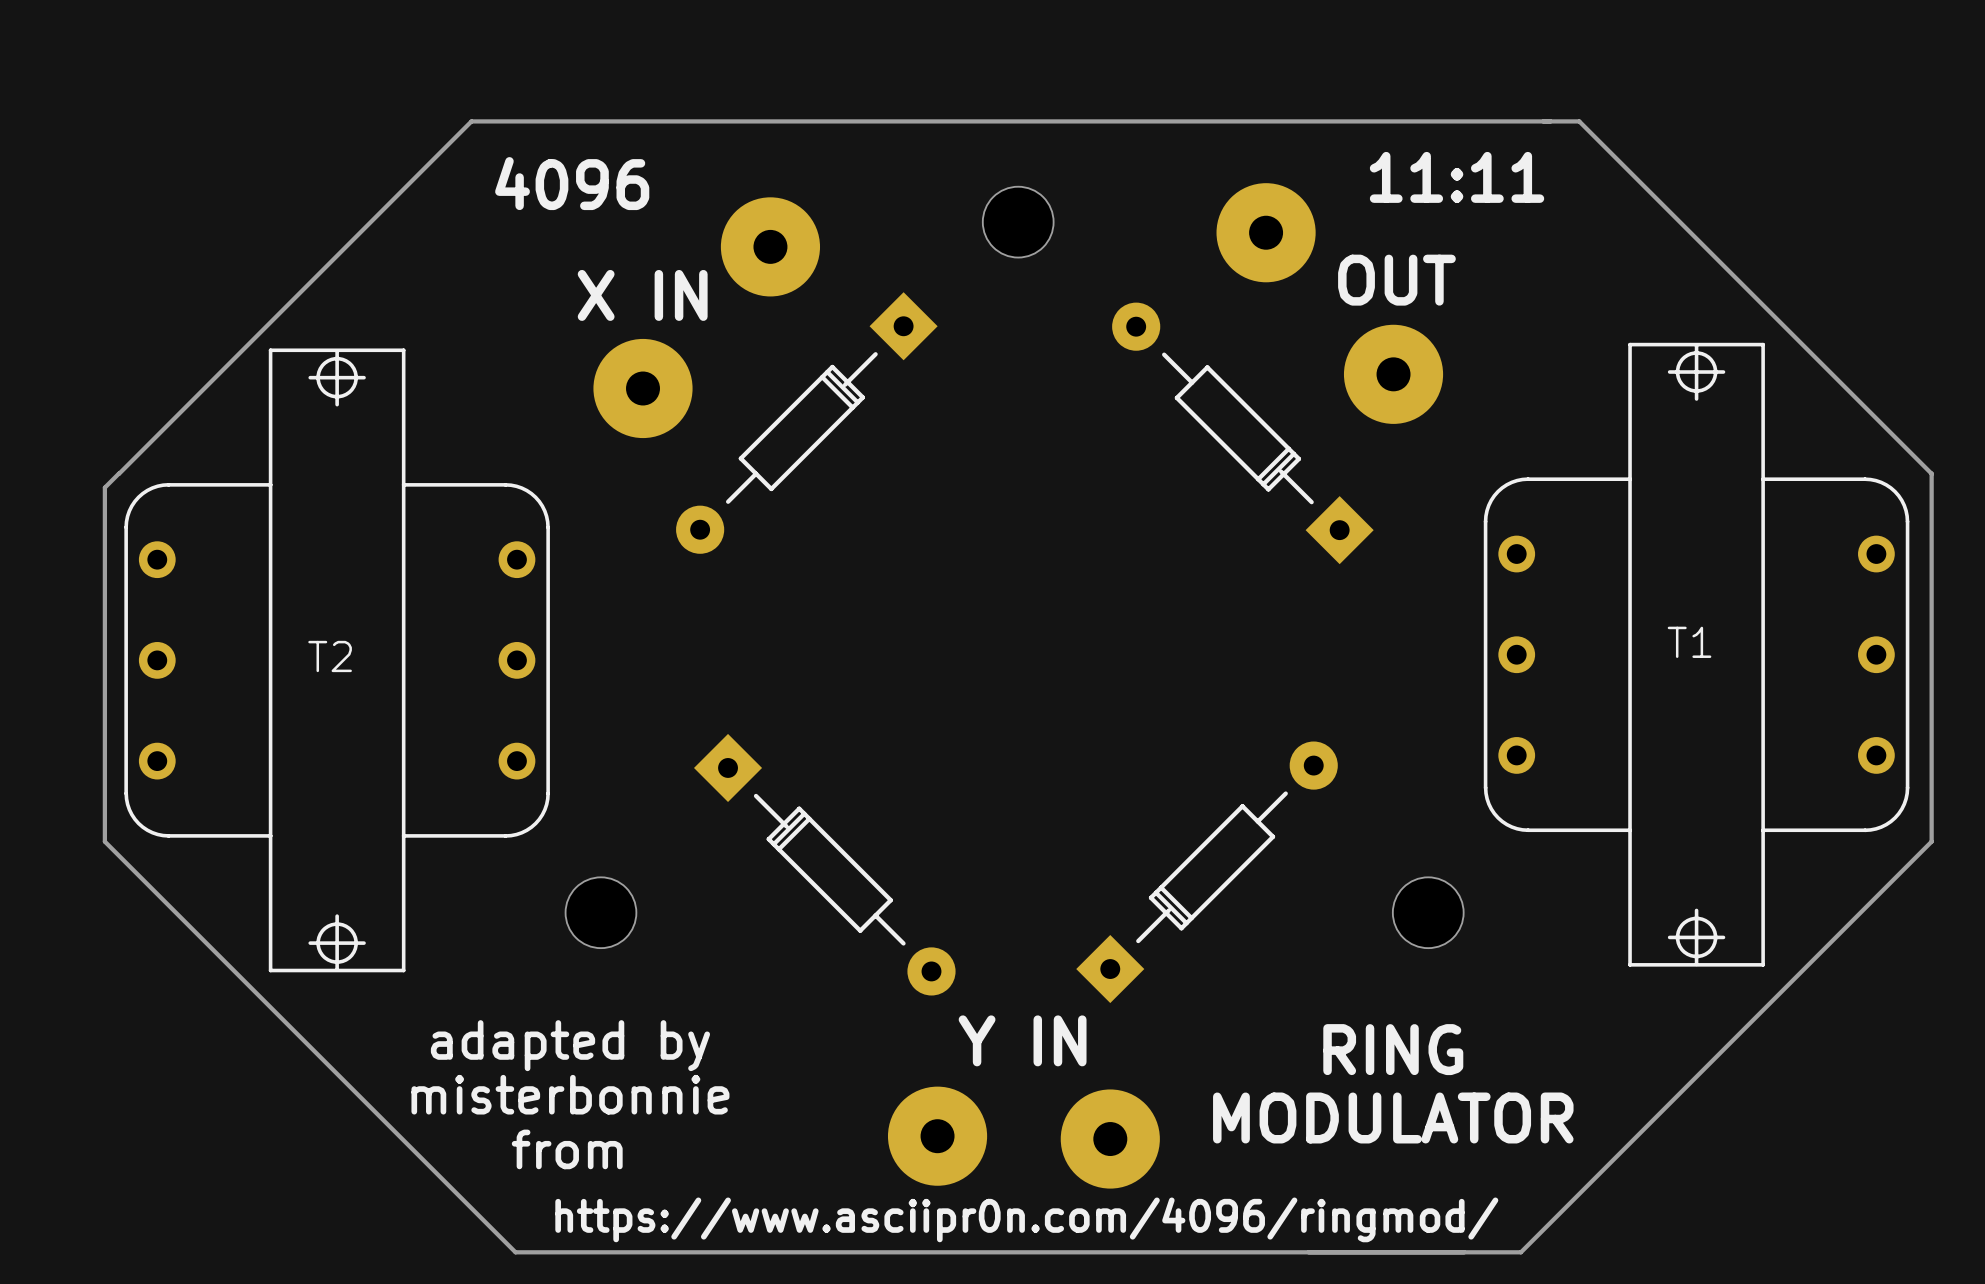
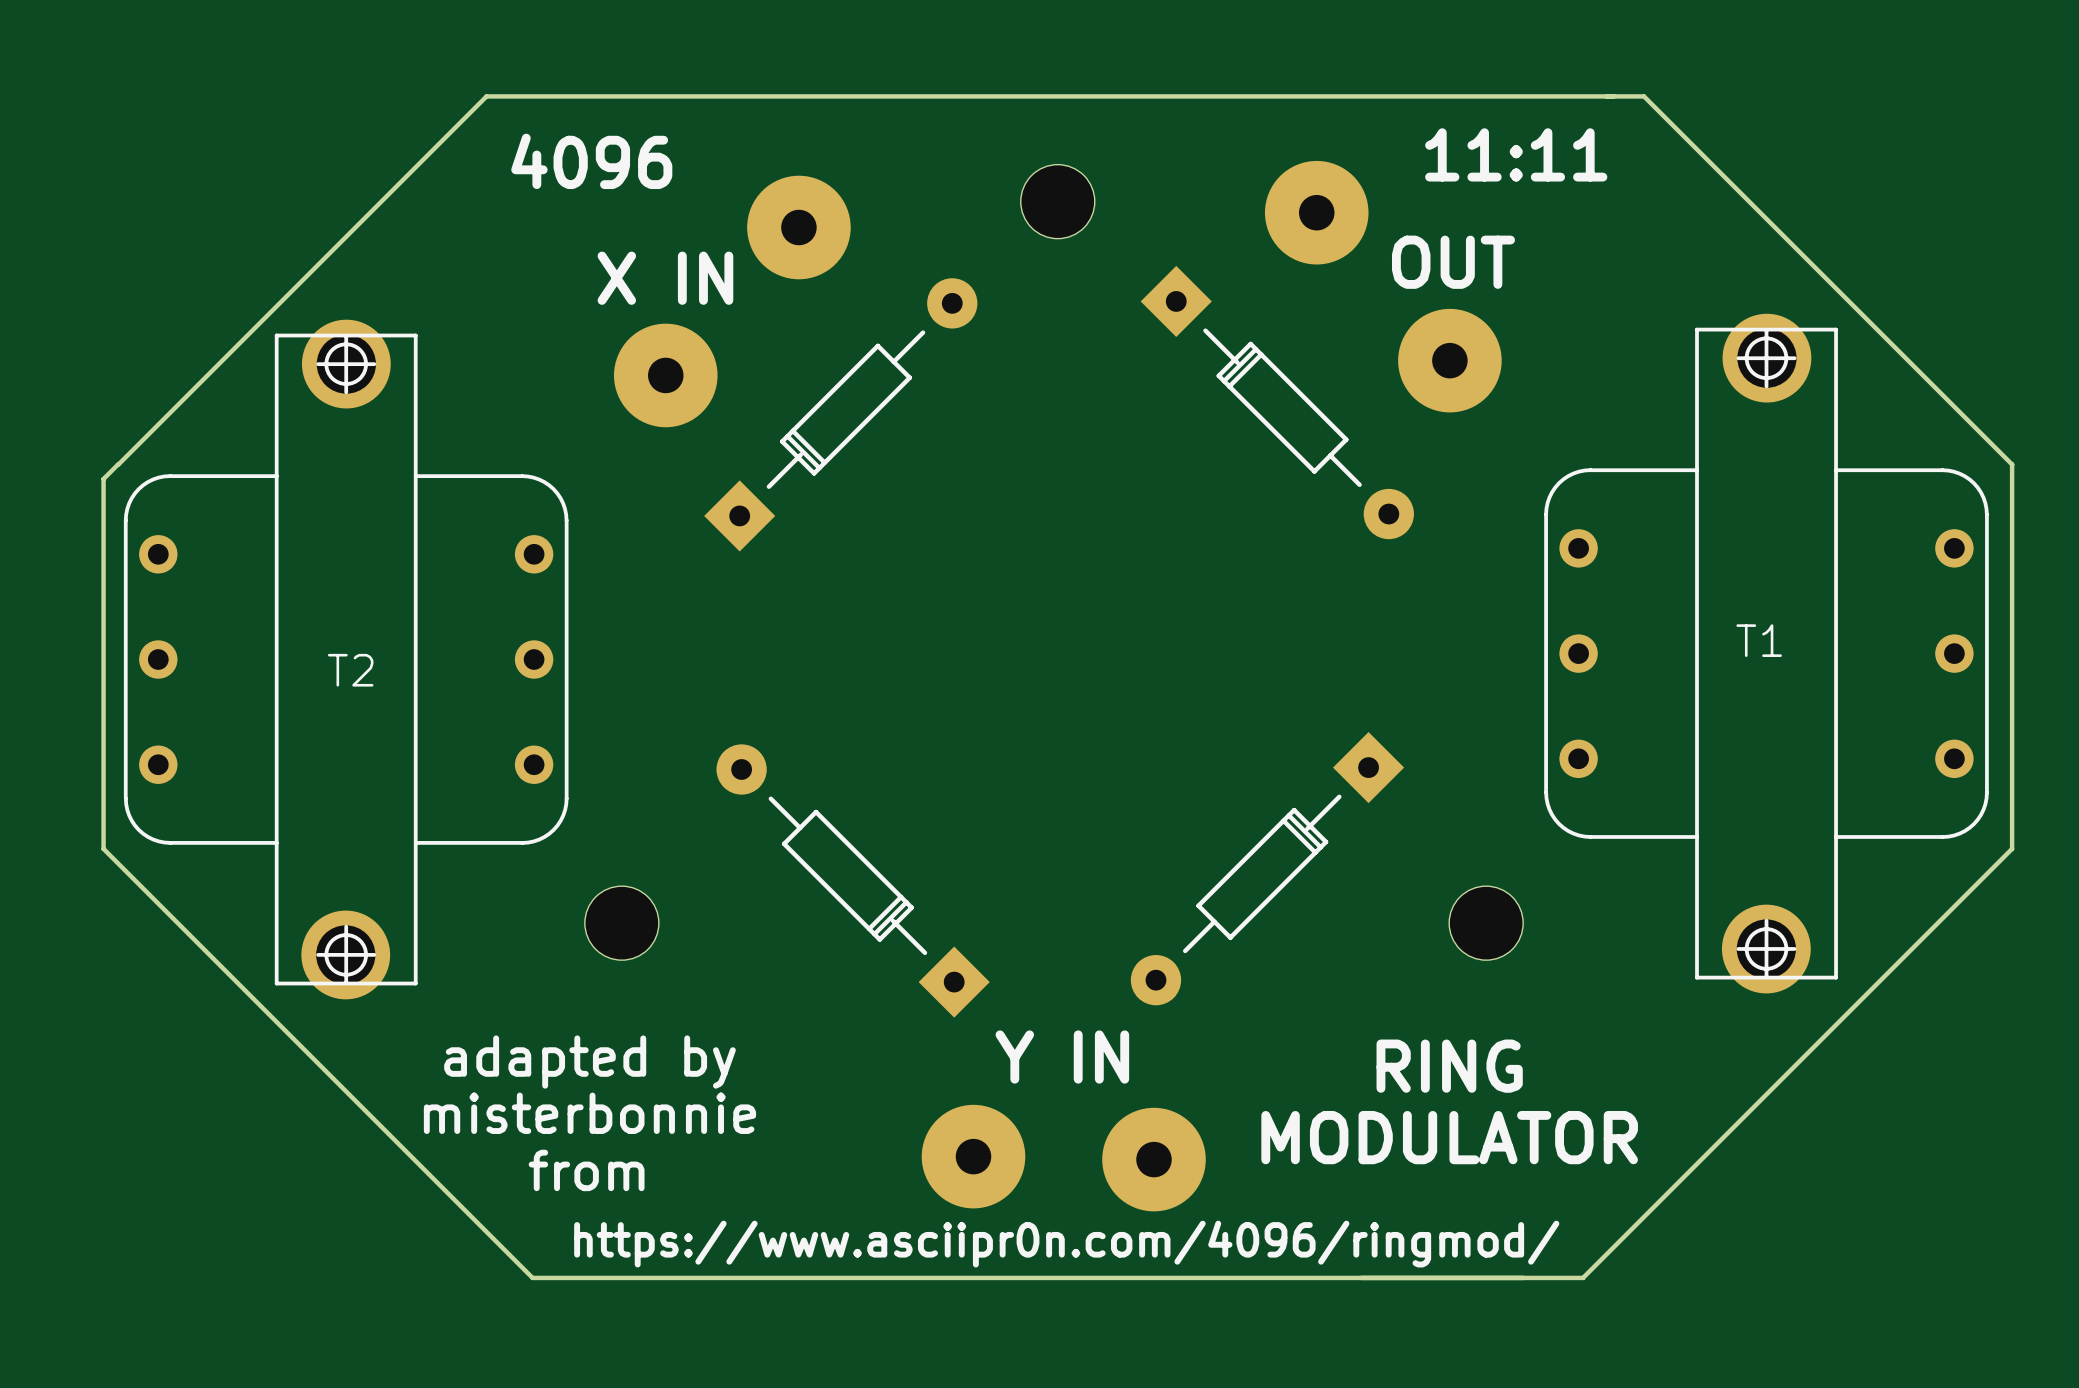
T1 footprint: [1483, 342, 1910, 967] -> [1544, 313, 1989, 994]
T2 footprint: [124, 348, 550, 973] -> [123, 319, 569, 1000]
part rotation: 0° (806, 423) -> 180° (840, 414)
part rotation: 0° (1242, 433) -> 180° (1277, 402)
part rotation: 0° (824, 864) -> 180° (853, 881)
part rotation: 0° (1207, 872) -> 180° (1267, 868)

